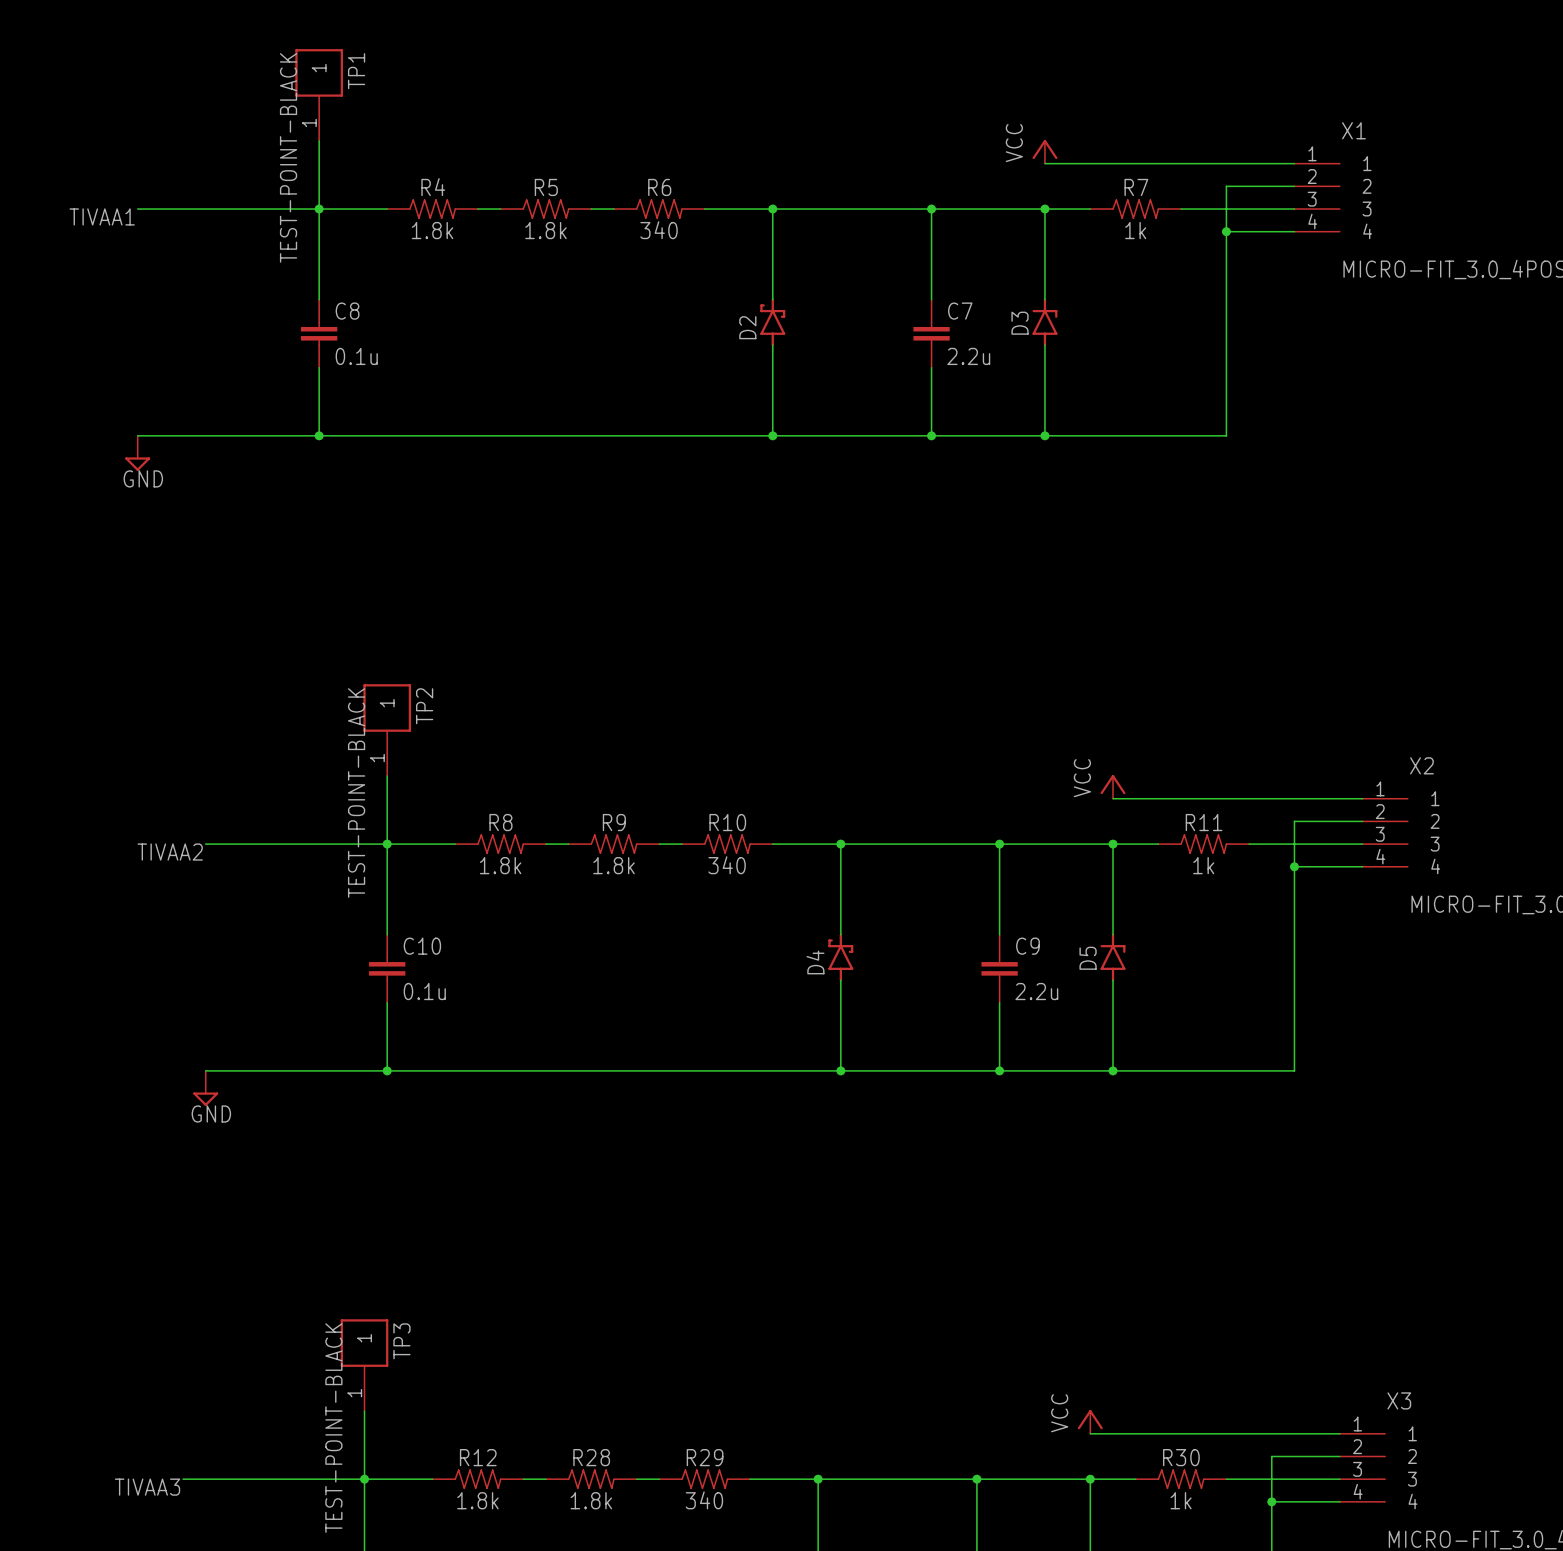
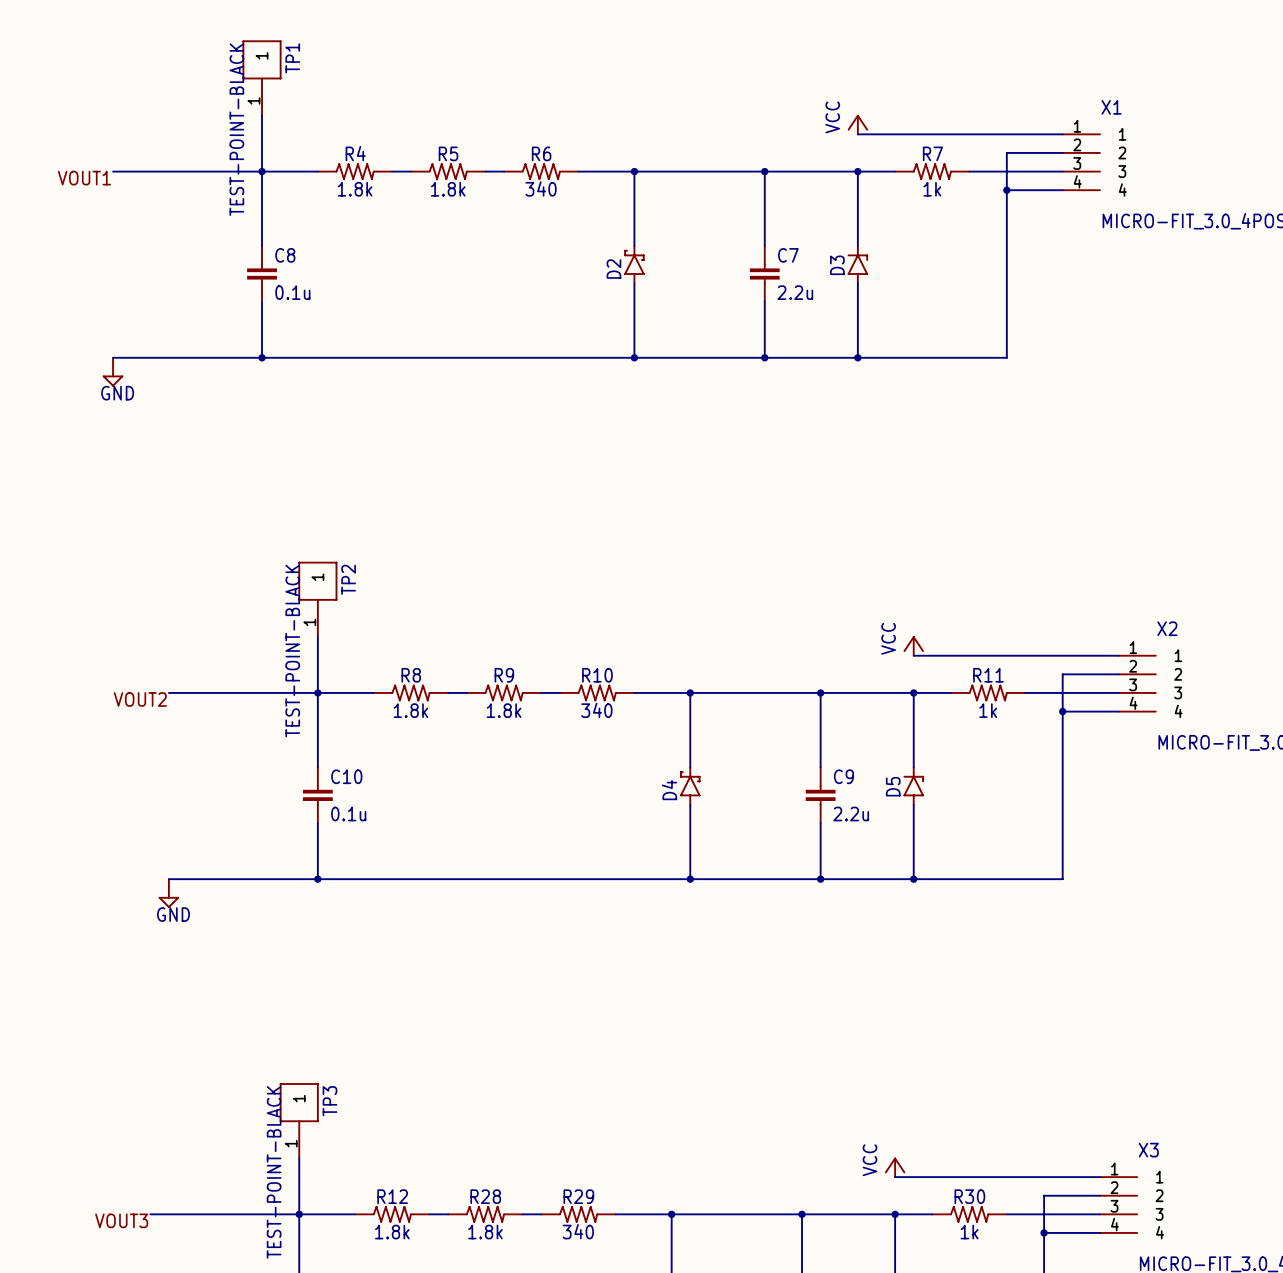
label: TIVAA1 (102, 216) -> VOUT1 (84, 178)
label: TIVAA2 (170, 852) -> VOUT2 (140, 699)
label: TIVAA3 (147, 1487) -> VOUT3 (121, 1220)

